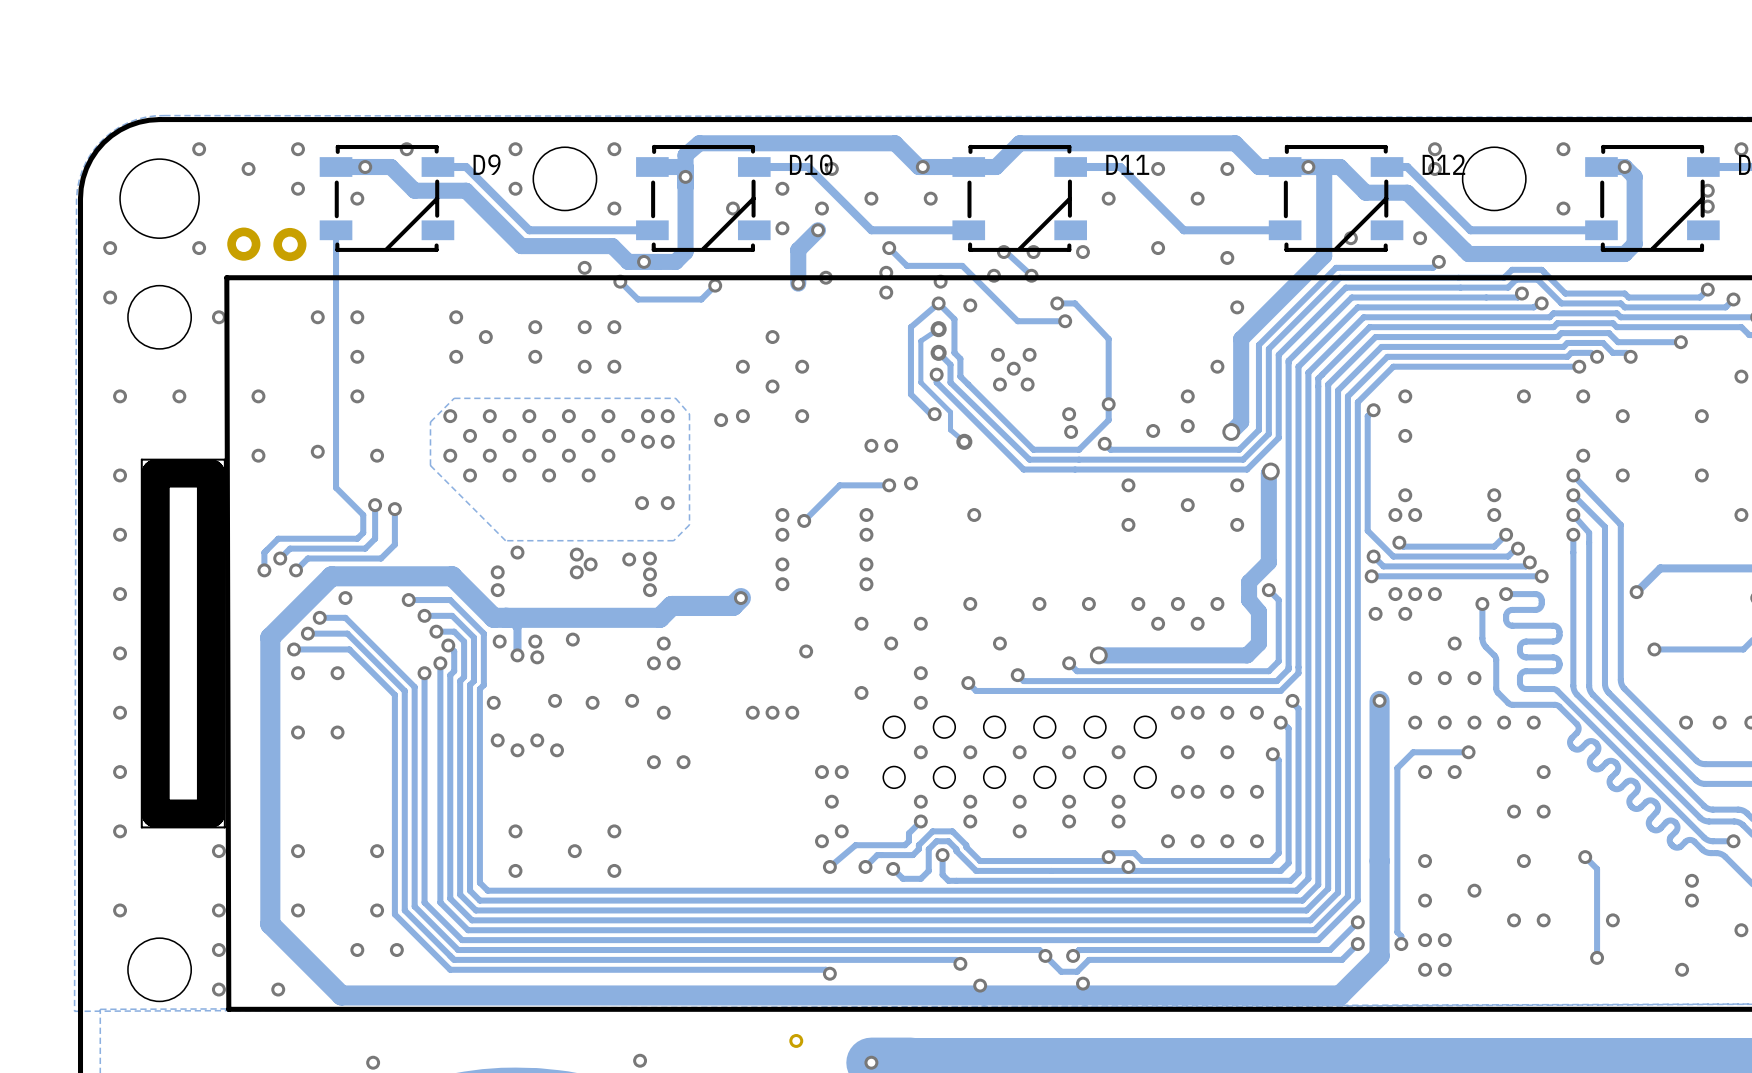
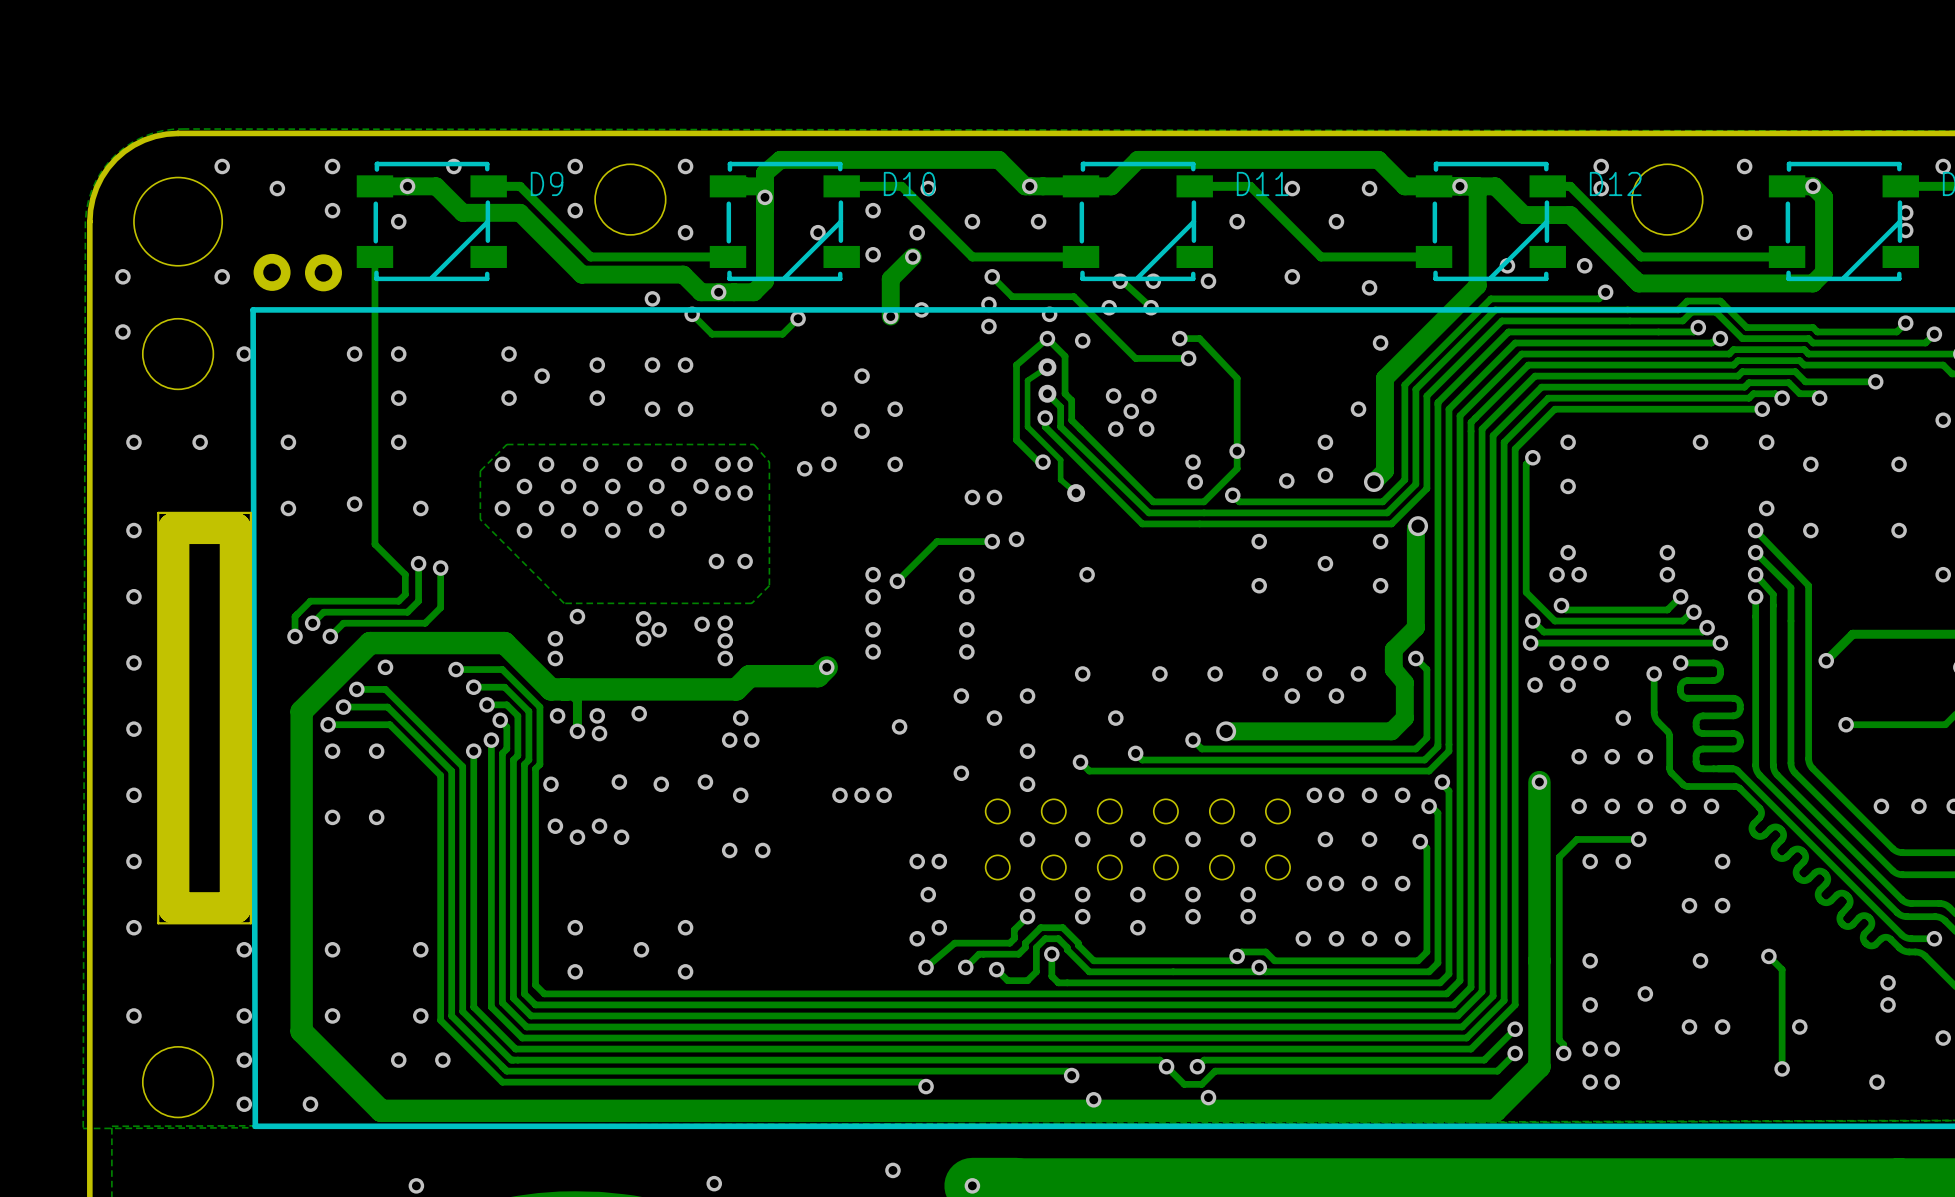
part: (796, 1040) -> none
via: none -> (892, 1170)

